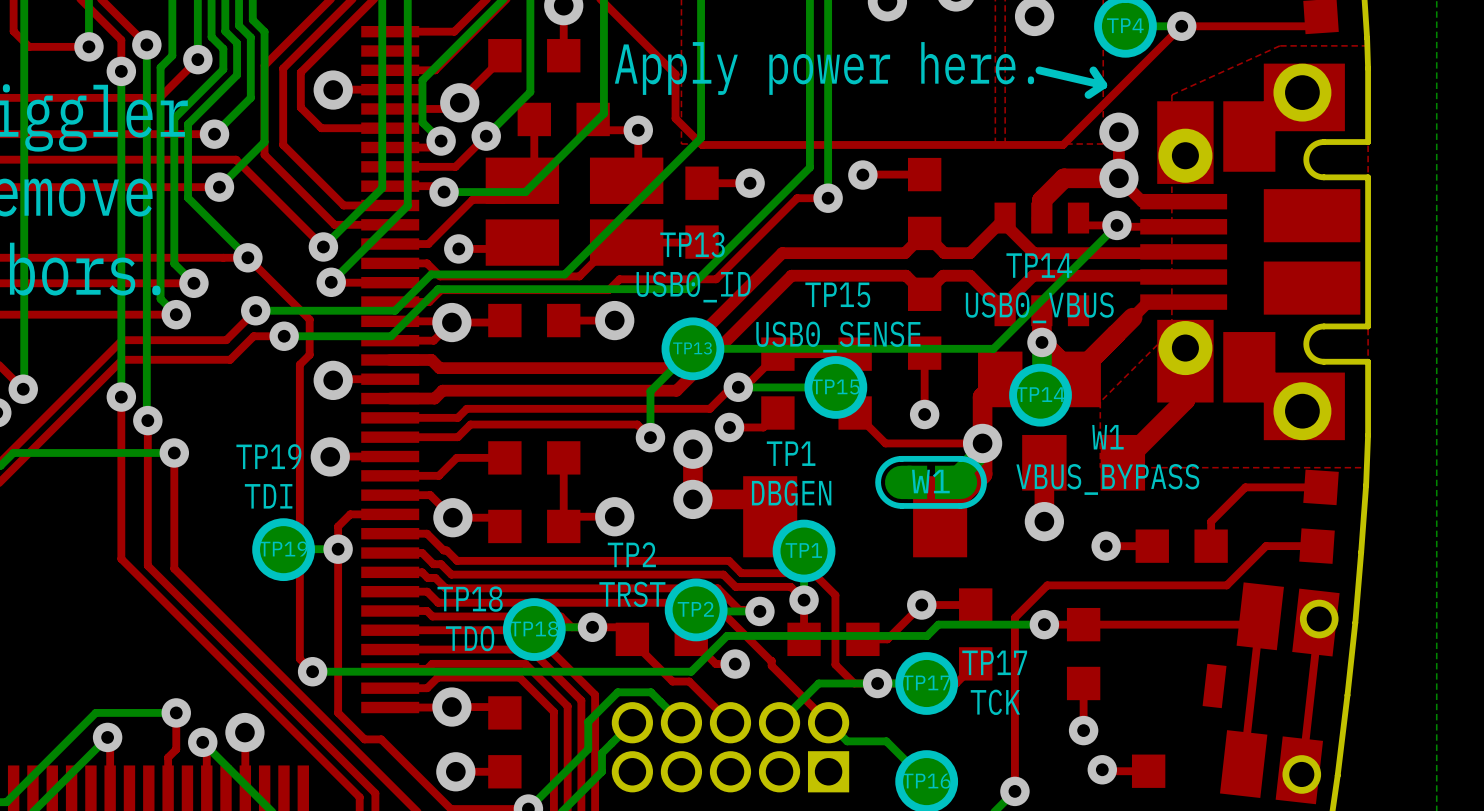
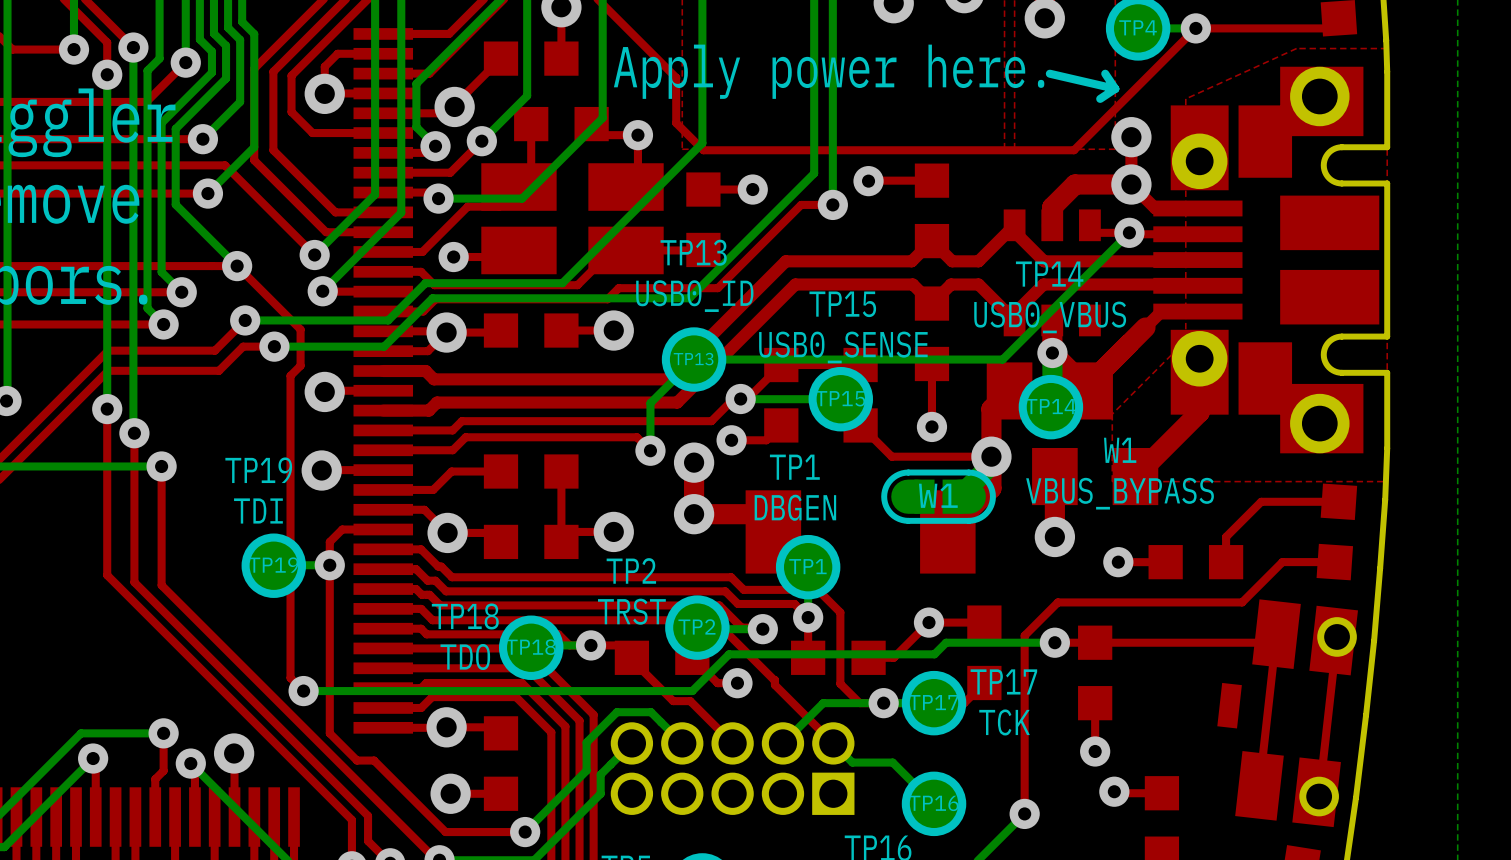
top track: none -> (383, 53) (337, 53) (324, 66) (324, 93)

